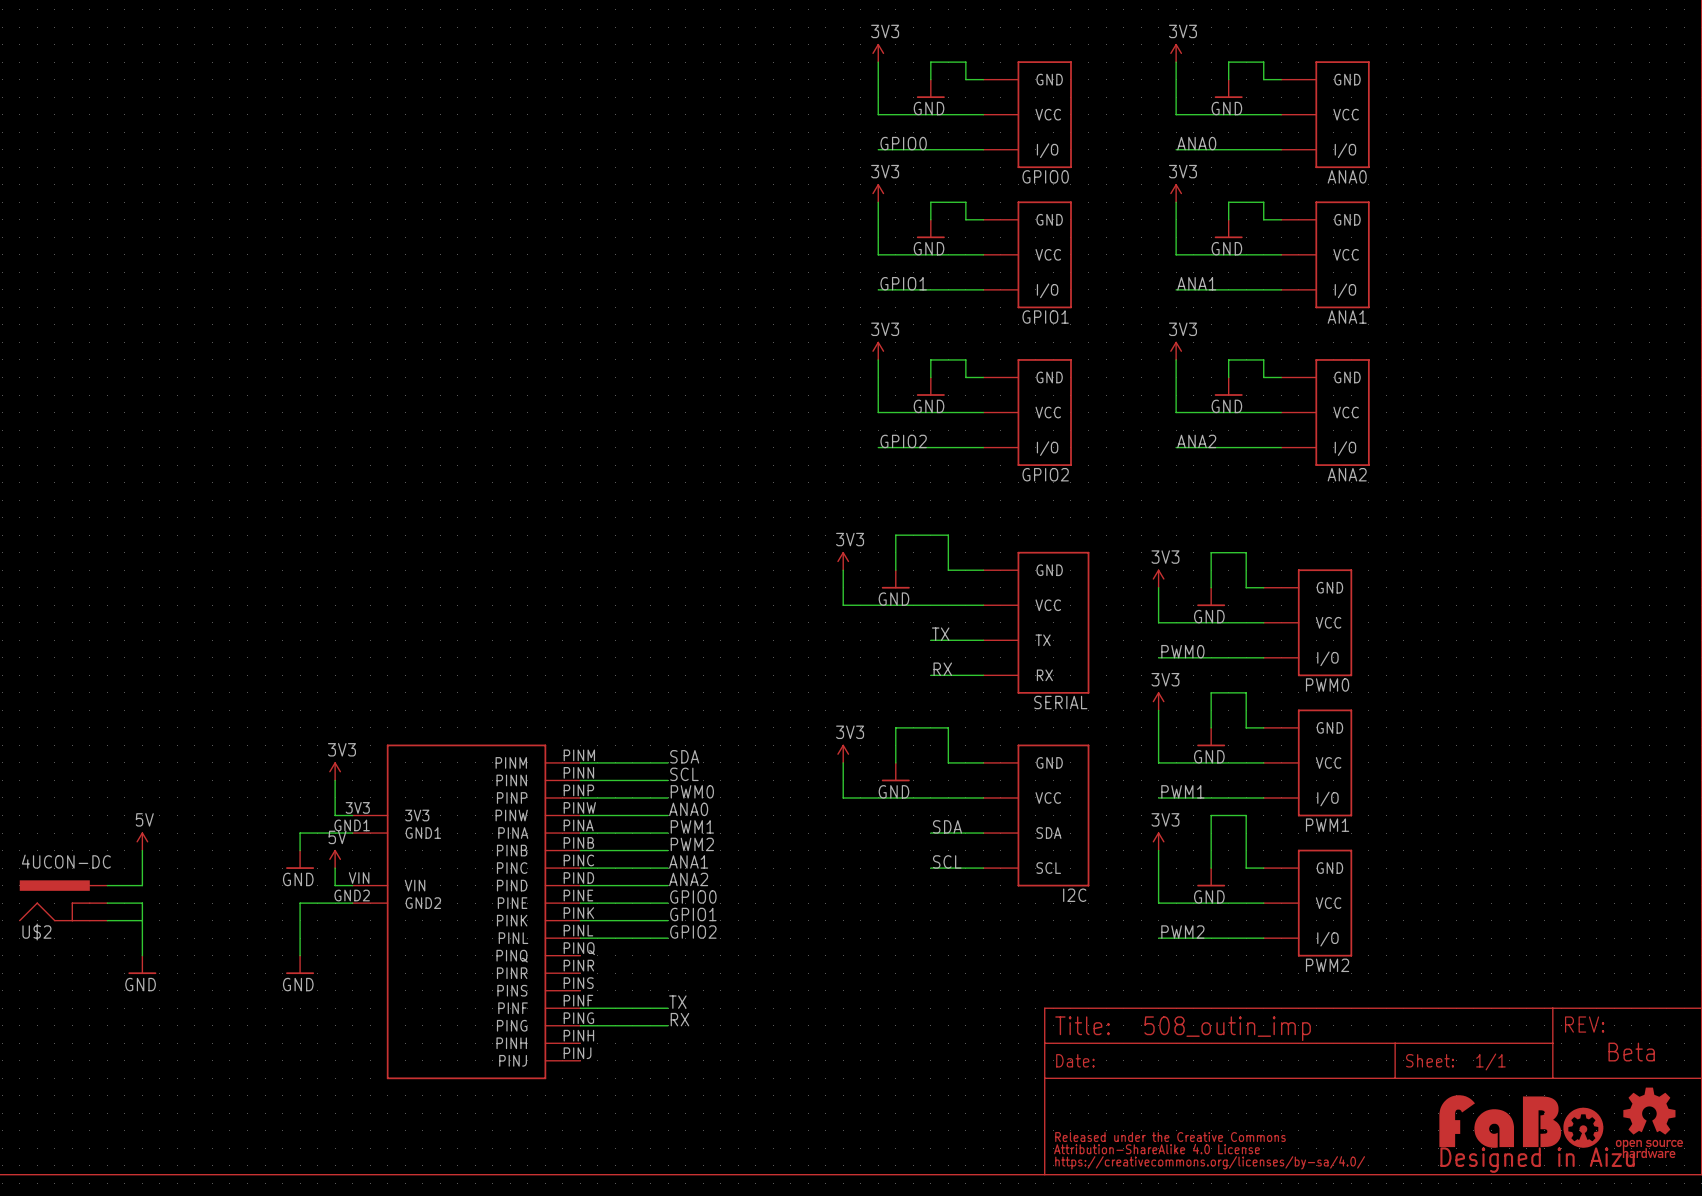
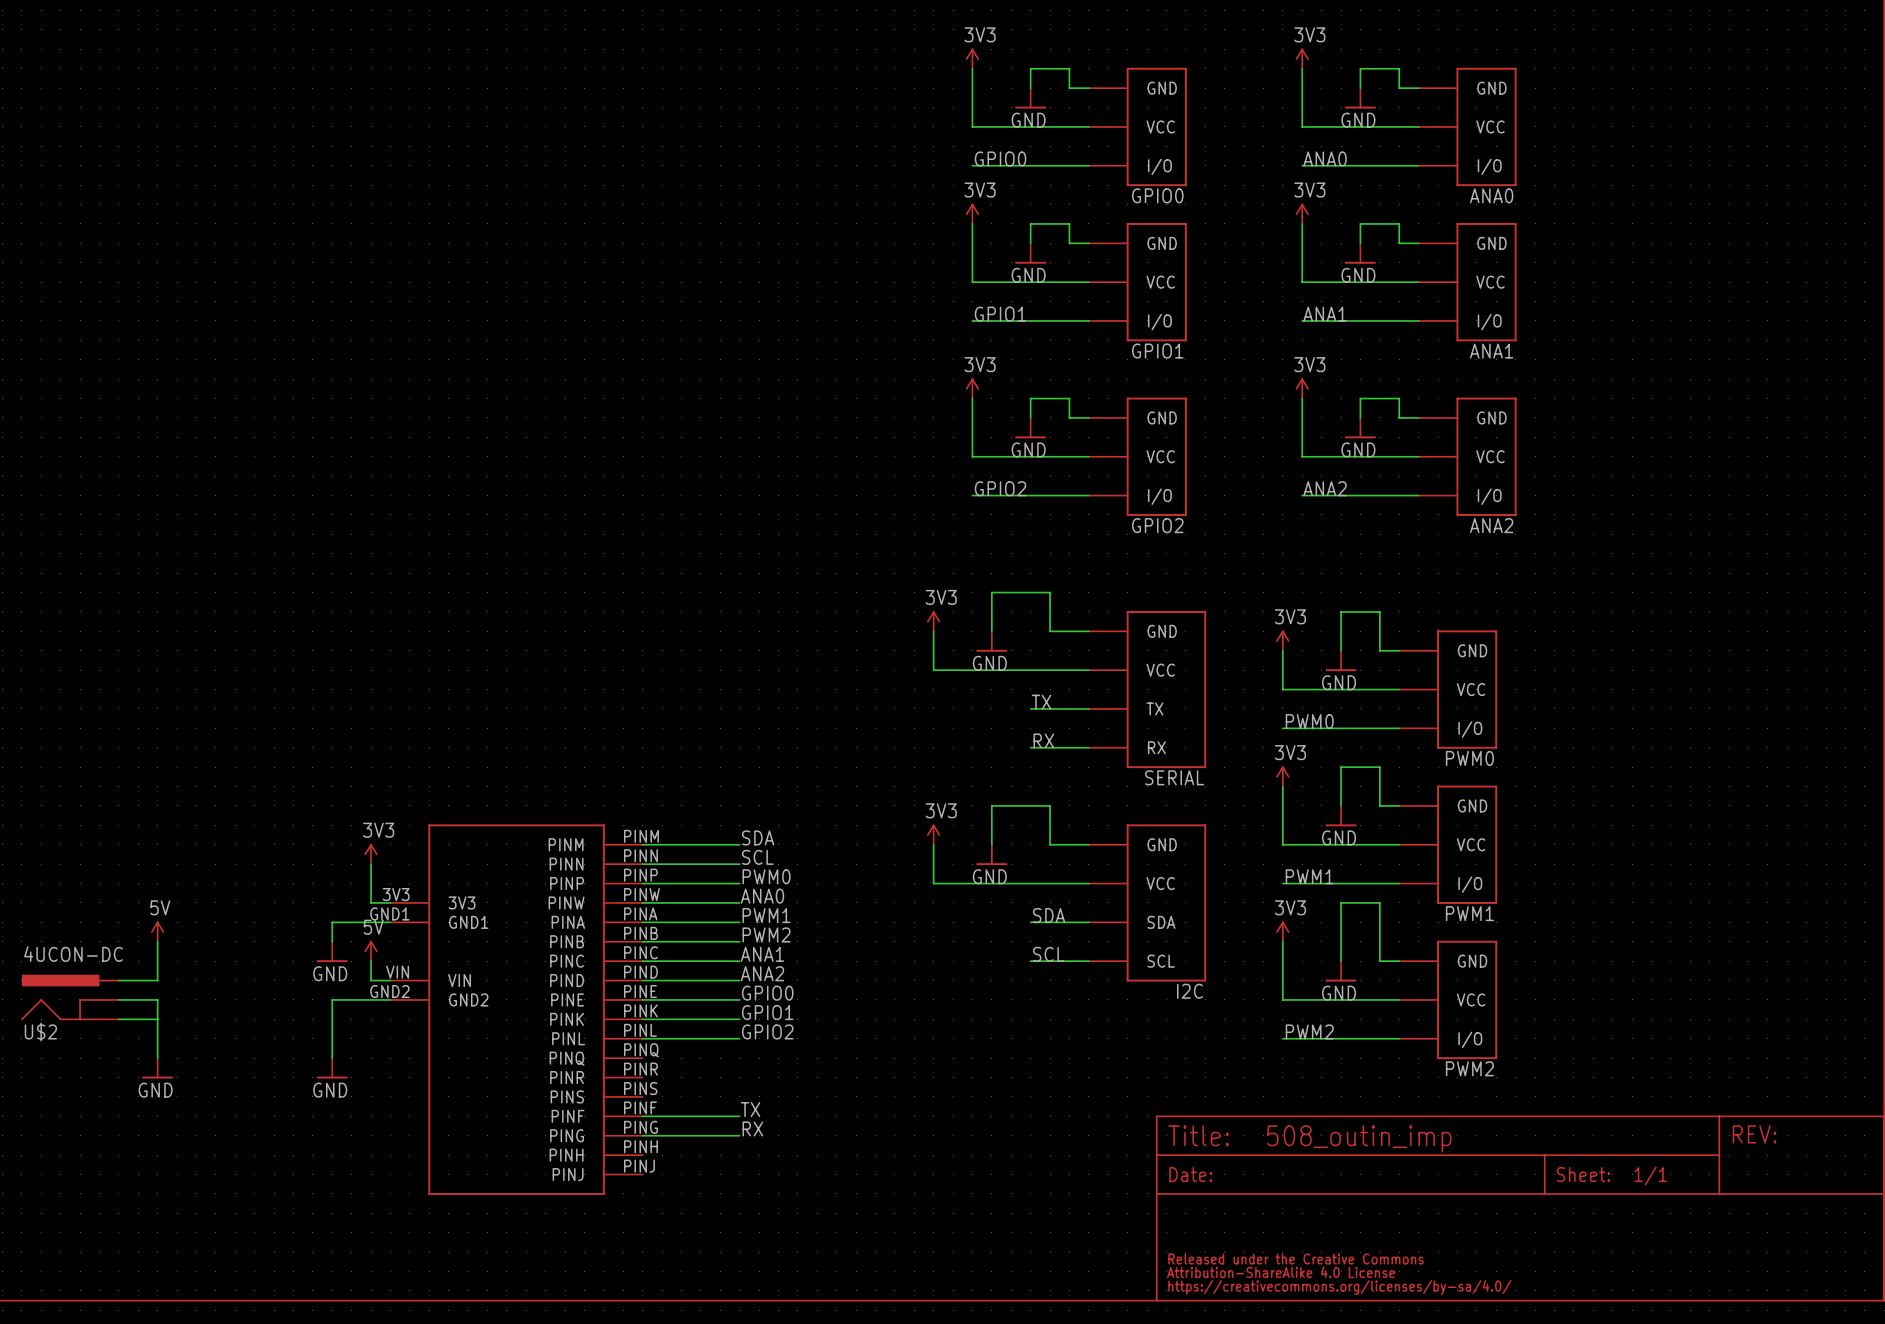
text: Beta (1631, 1052) -> none
part: (1521, 1121) -> none
part: (1649, 1122) -> none

